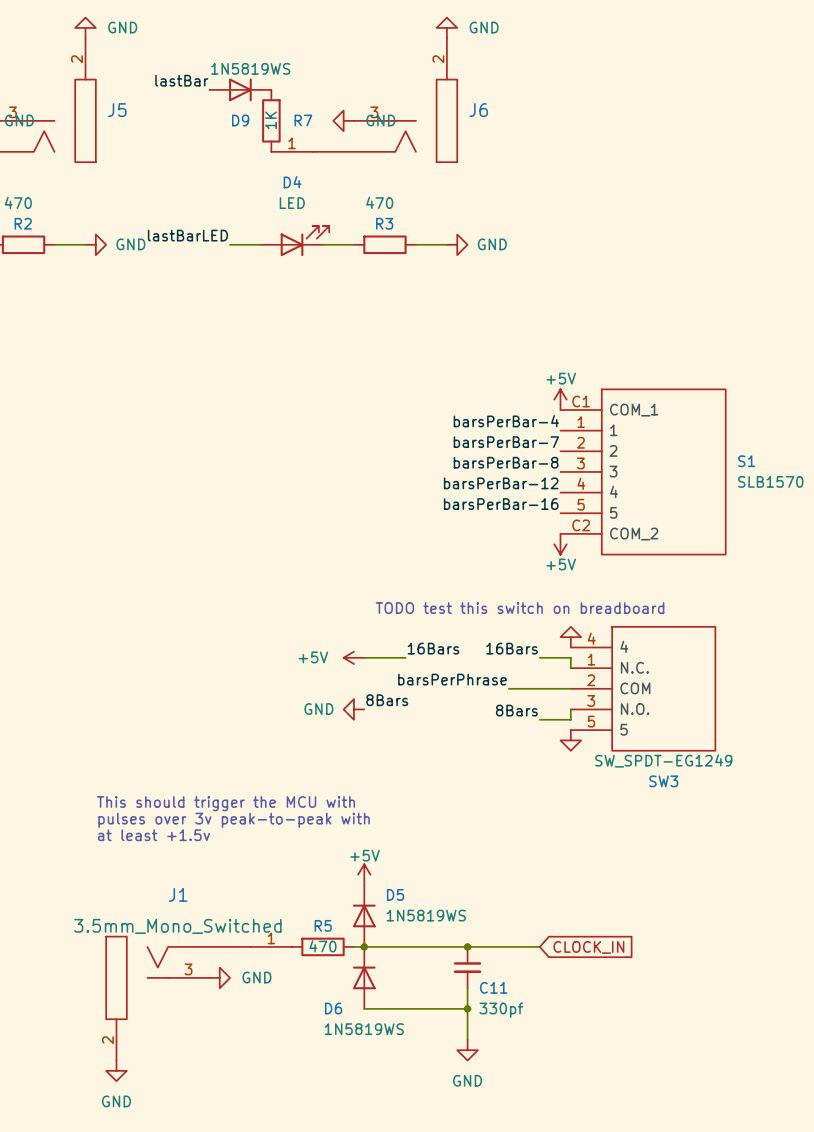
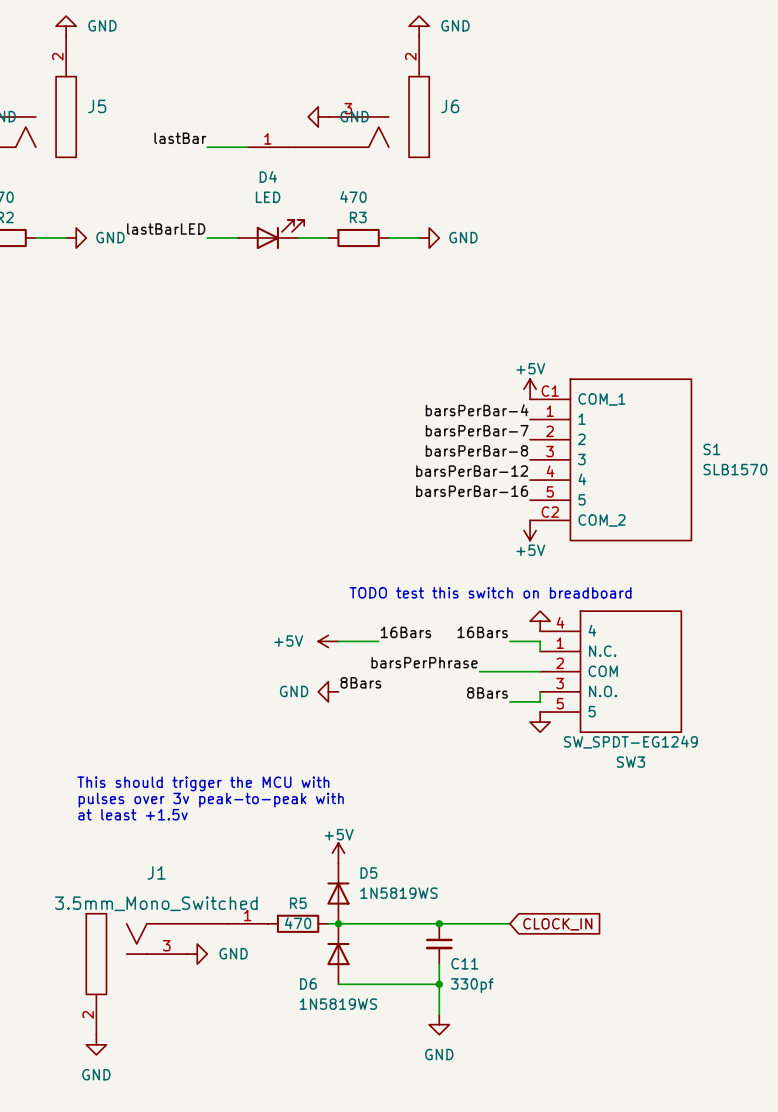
label position: lastBar (181, 80) -> lastBar (180, 138)
D9: 1N5819WS (240, 89) -> none
R7: 1K (271, 120) -> none
wire: none -> (207, 147) (247, 147)

